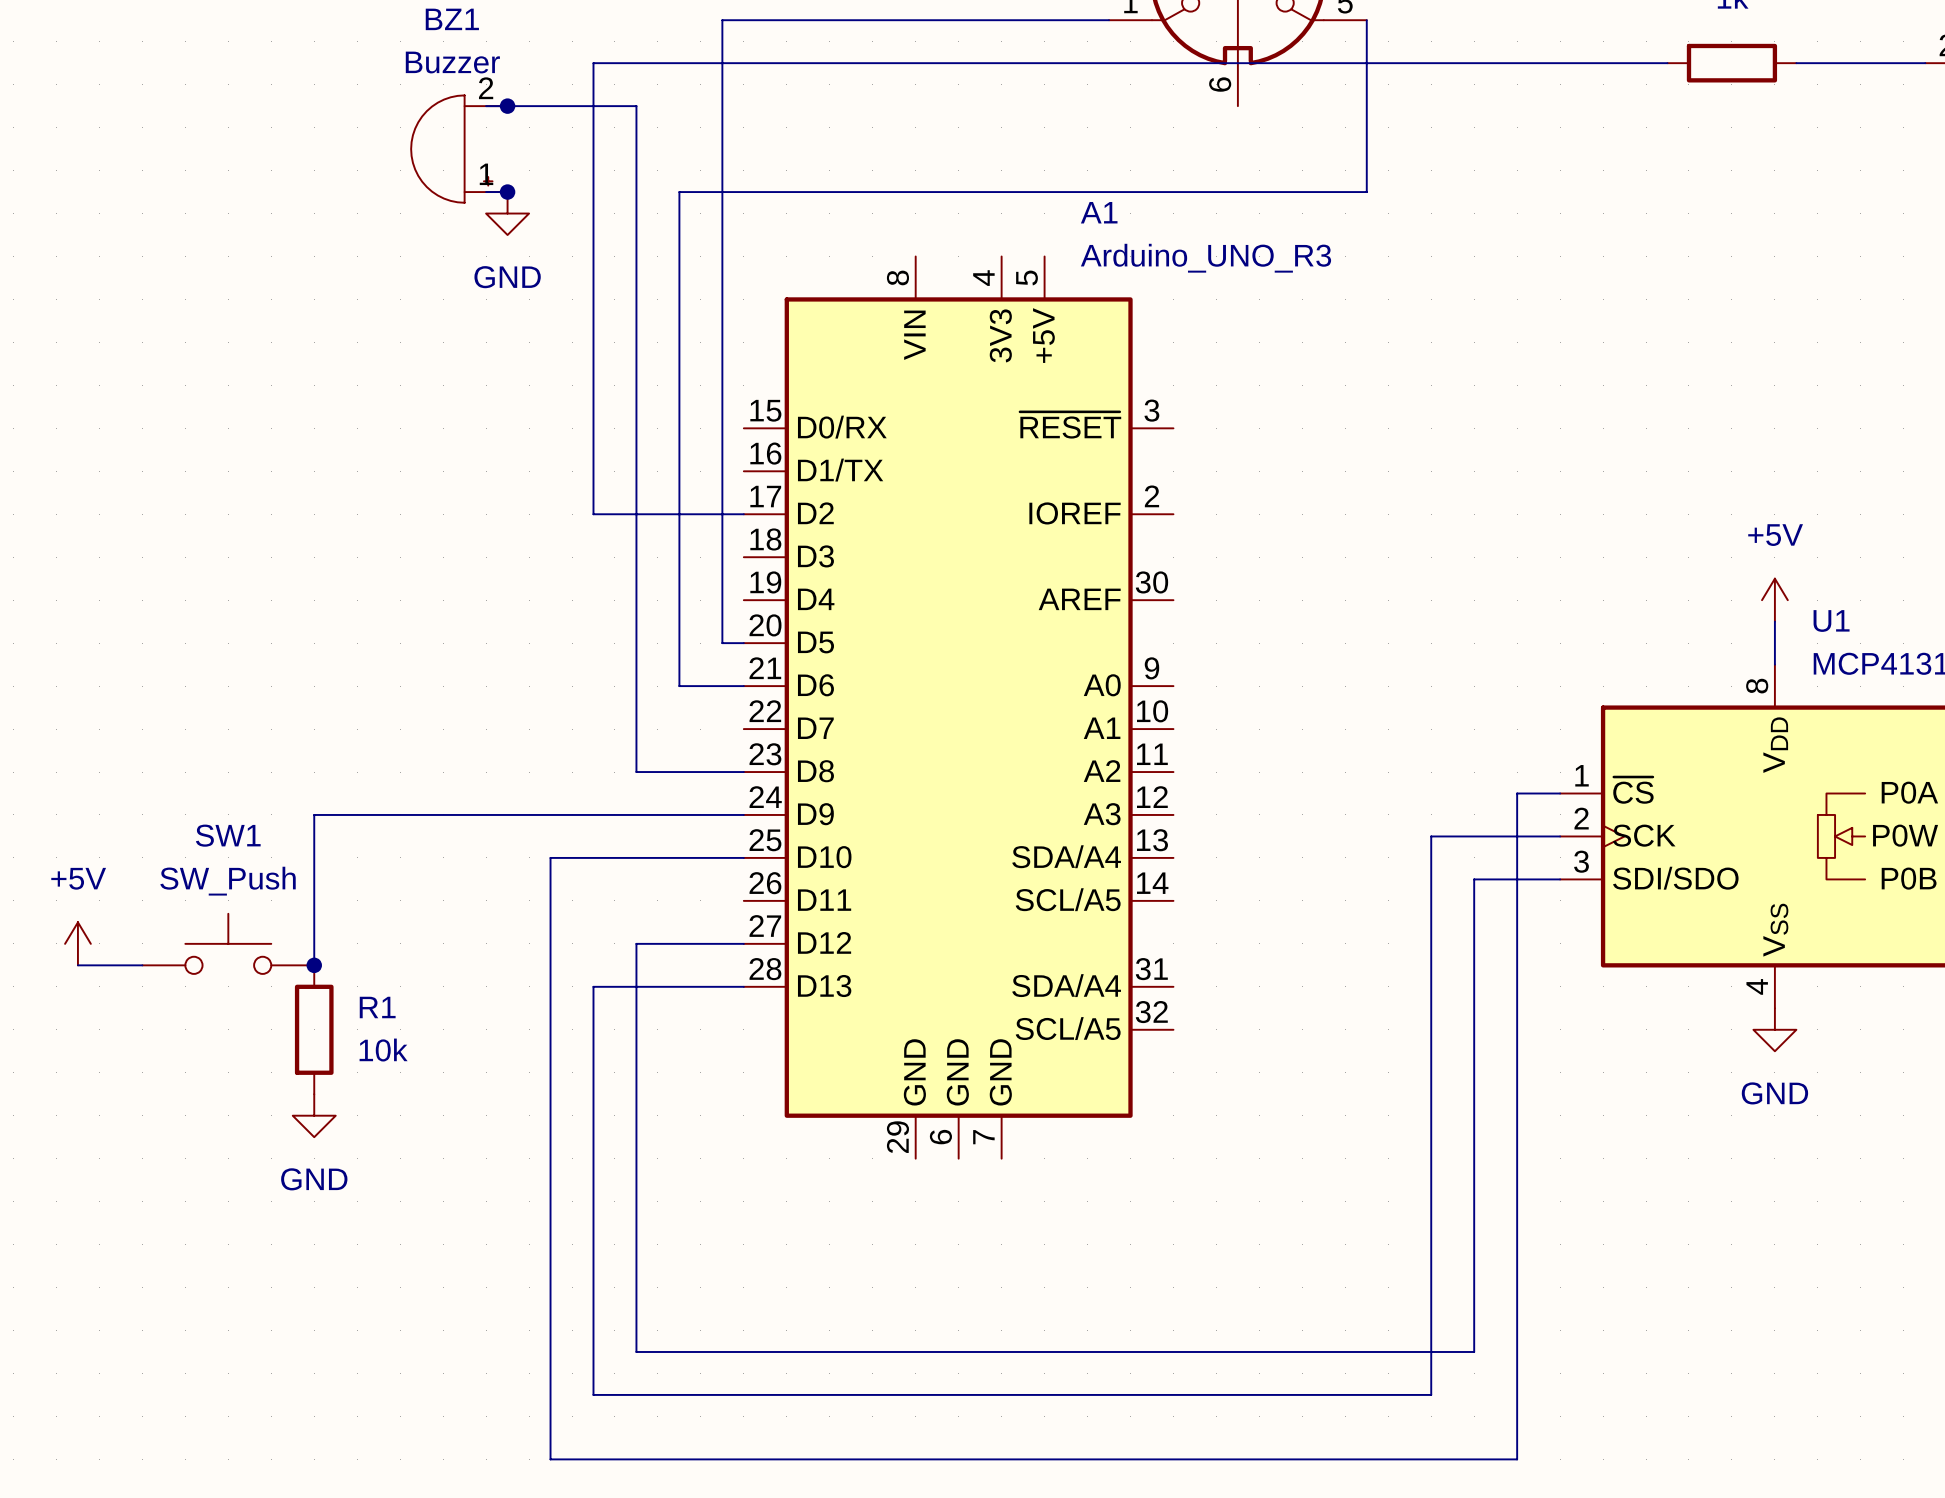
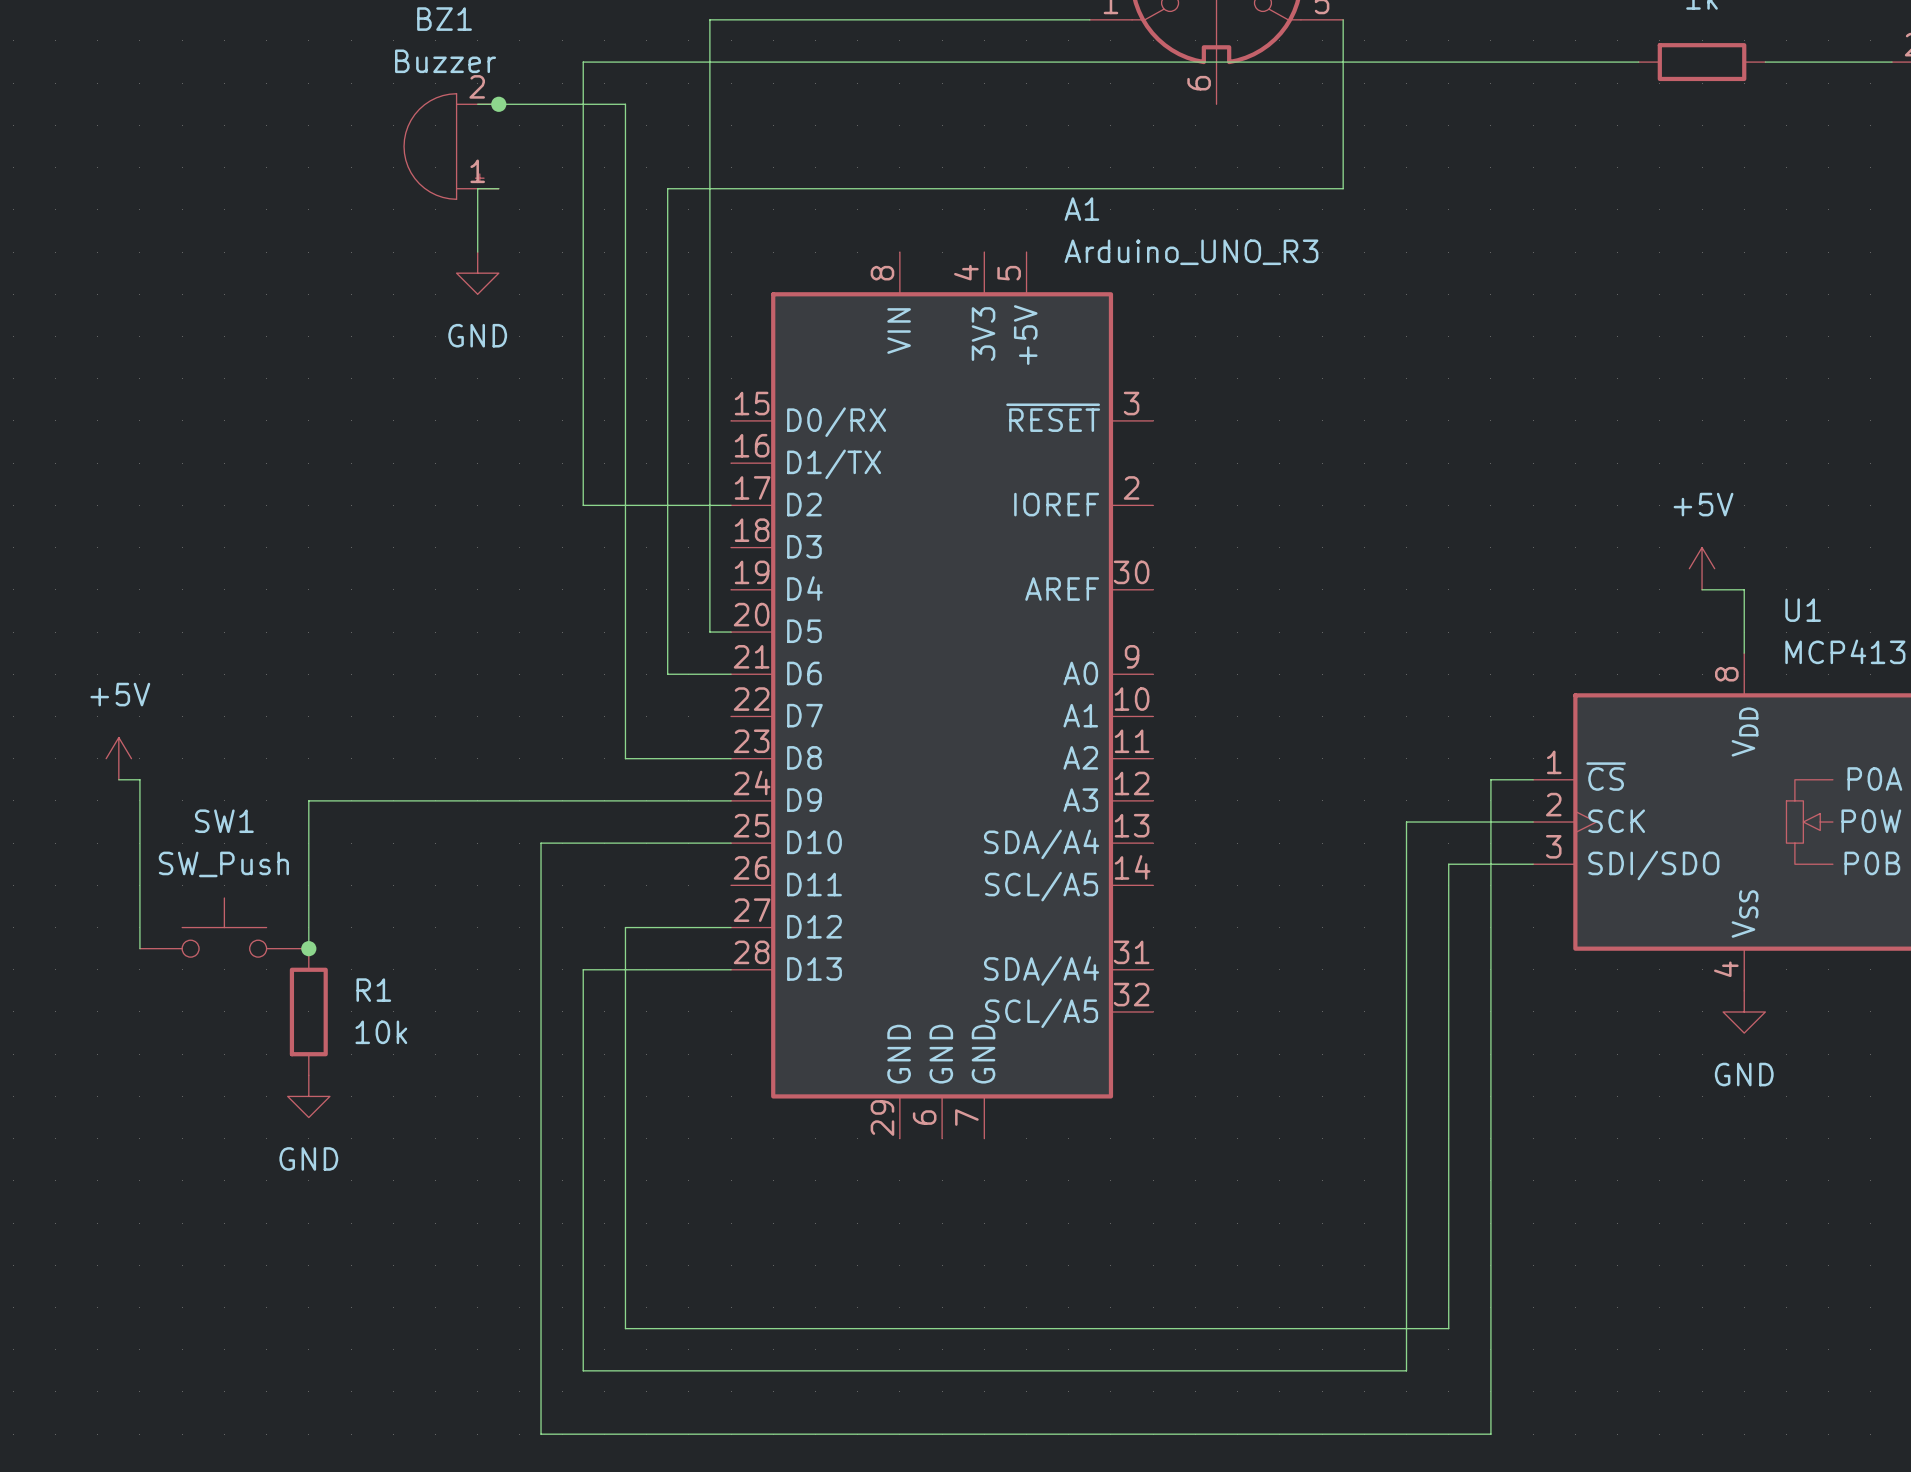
wire: none -> (477, 188) (477, 252)
junction: (507, 192) -> none
power symbol position: GND (507, 213) -> GND (477, 273)
wire: none -> (1702, 589) (1744, 589) (1744, 610)
power symbol position: +5V (1774, 600) -> +5V (1702, 568)
power symbol position: +5V (77, 943) -> +5V (118, 758)
wire: (77, 965) (142, 965) -> (118, 779) (139, 779) (139, 948)

